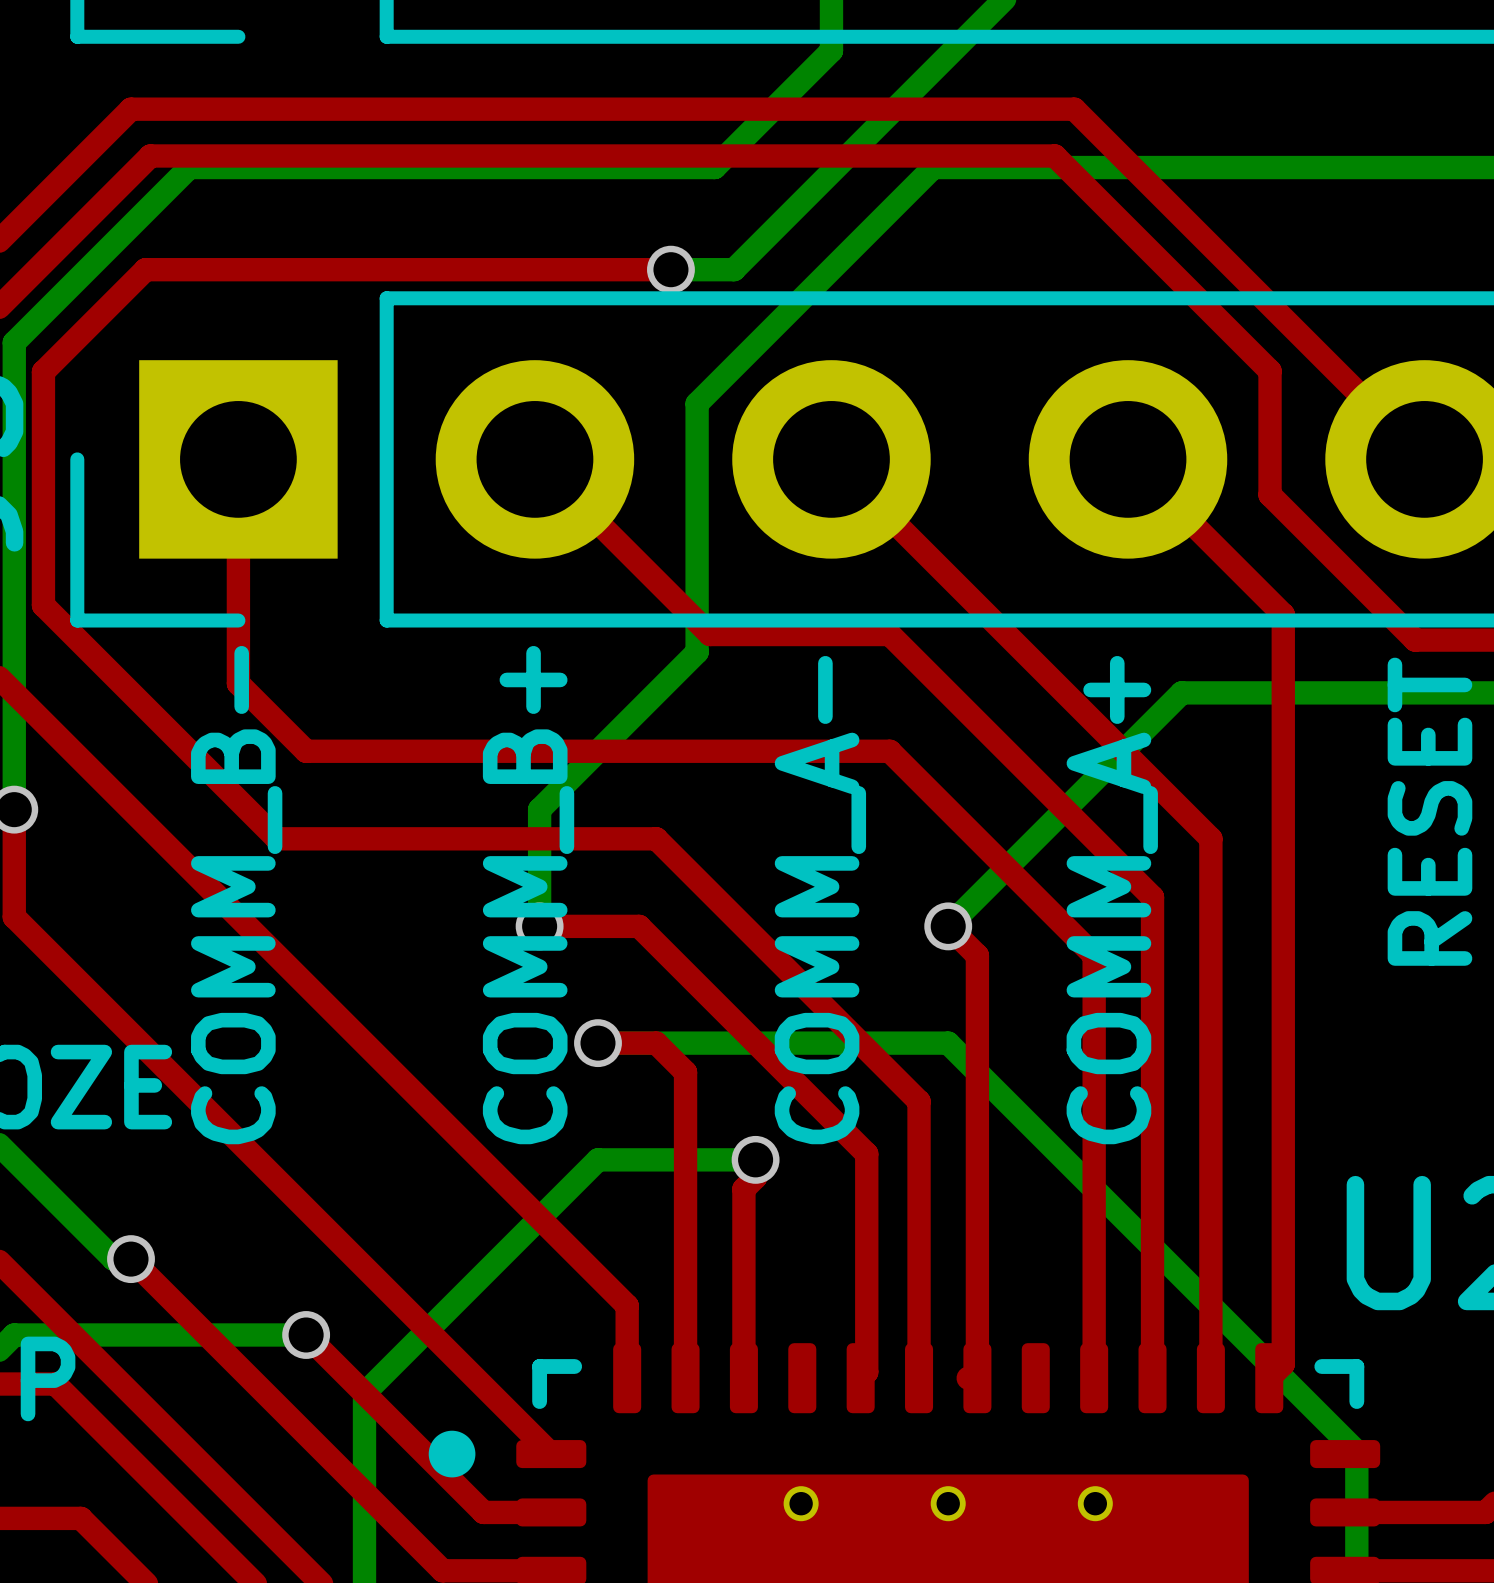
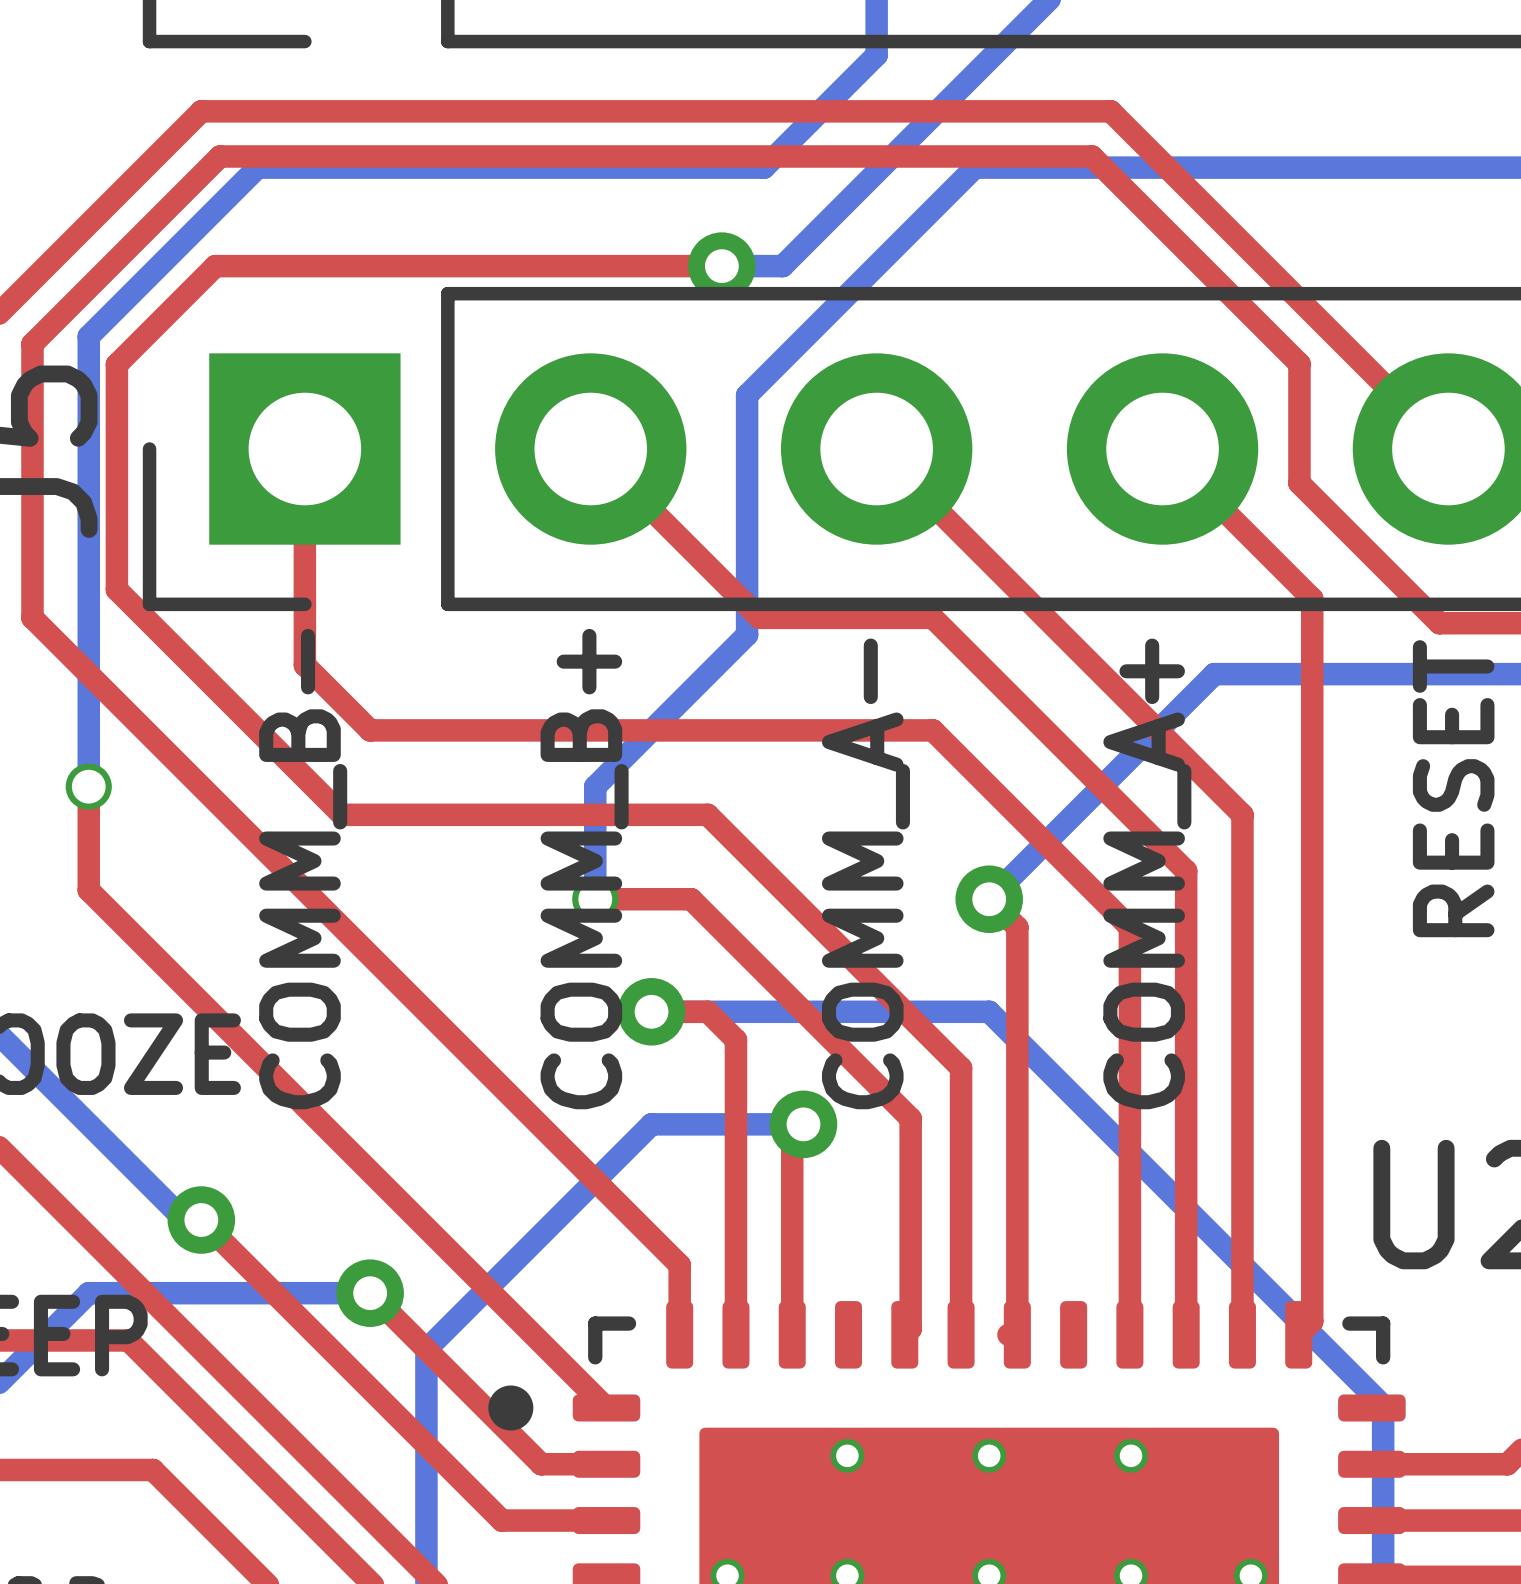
via size: [647, 245, 695, 294] -> [688, 232, 756, 300]
via size: [924, 902, 973, 951] -> [955, 865, 1023, 934]
via size: [574, 1019, 622, 1068] -> [617, 978, 686, 1046]
via size: [731, 1135, 780, 1184] -> [769, 1090, 838, 1159]
via size: [107, 1235, 155, 1284] -> [167, 1186, 236, 1254]
via size: [282, 1311, 331, 1359] -> [336, 1259, 404, 1327]

